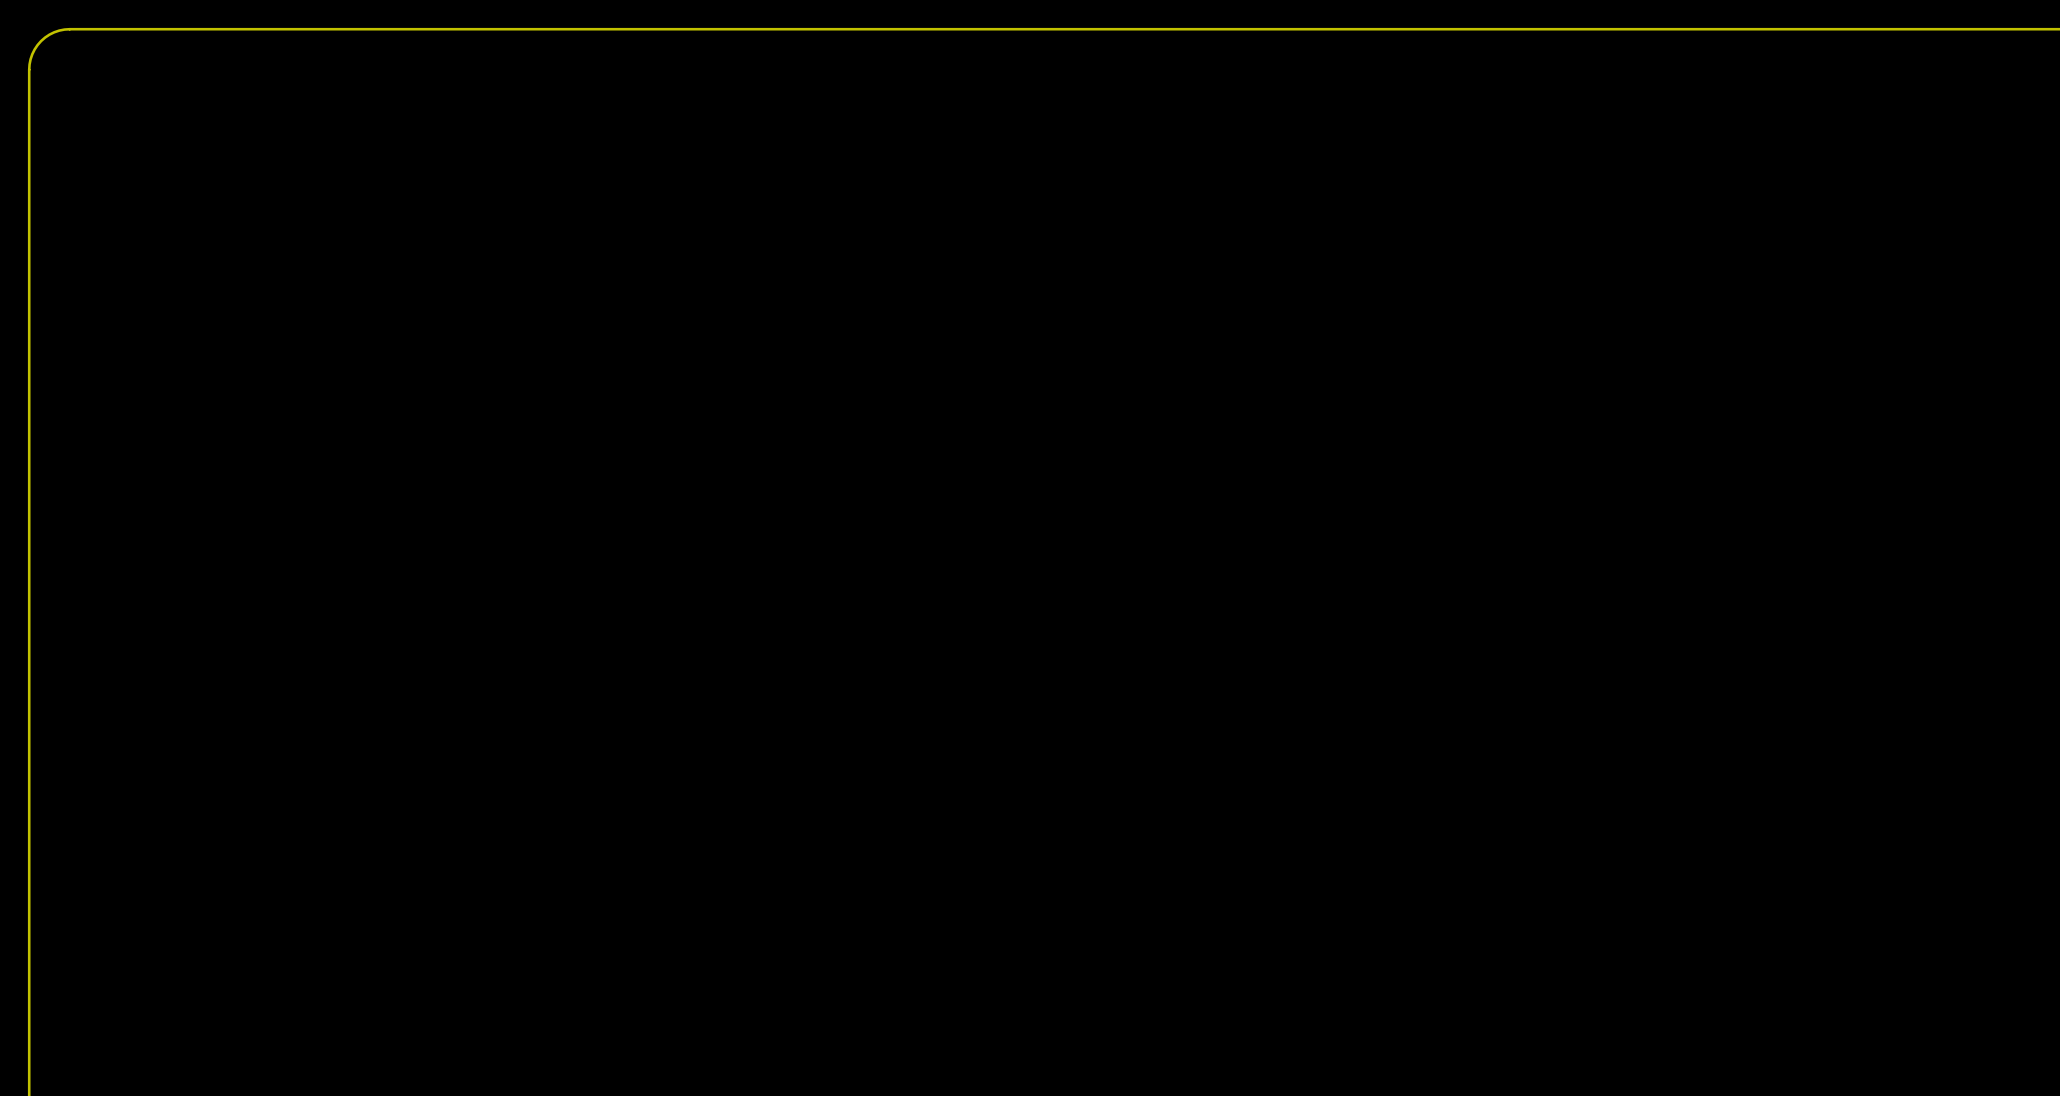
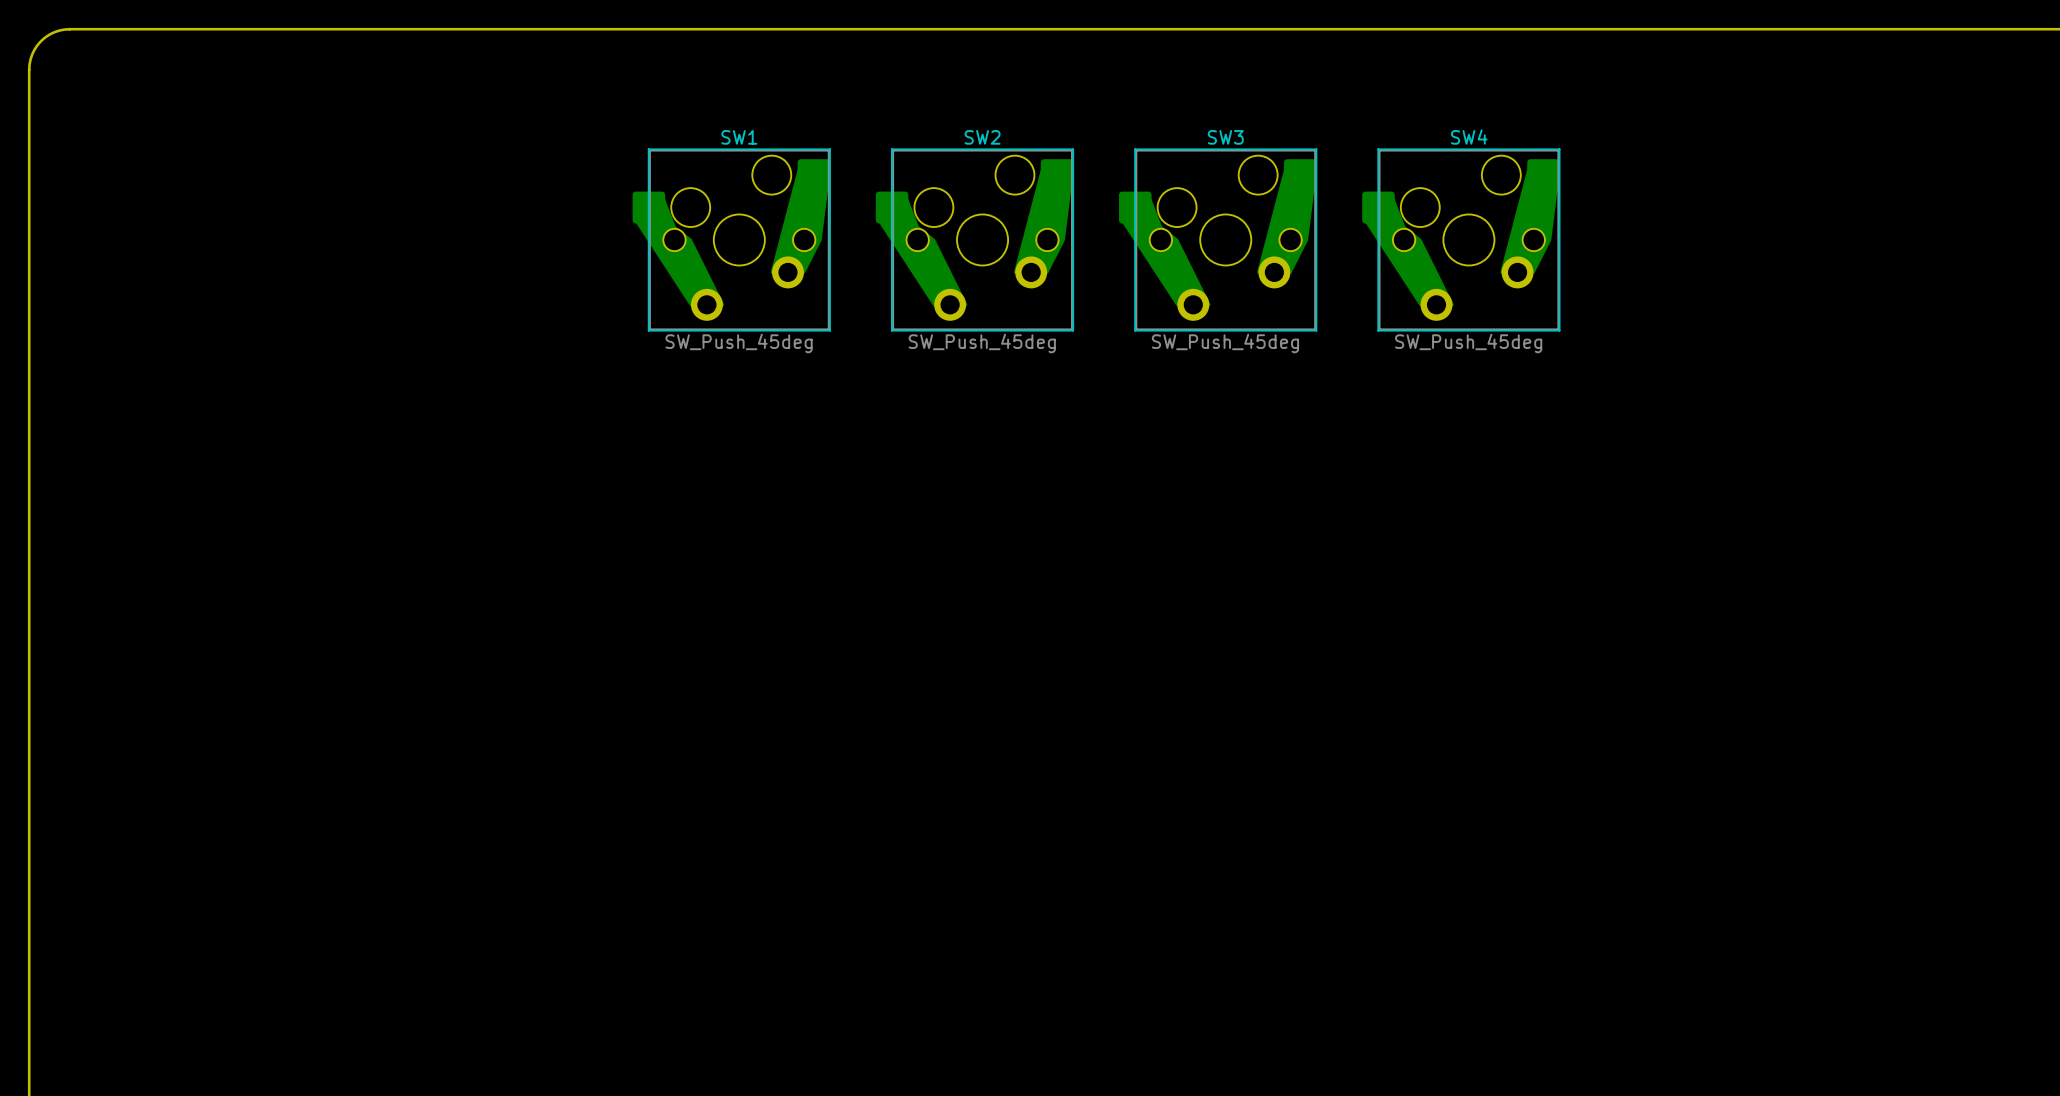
SW1: none -> SW_Push_45deg (731, 239)
SW2: none -> SW_Push_45deg (974, 239)
SW3: none -> SW_Push_45deg (1218, 239)
SW4: none -> SW_Push_45deg (1461, 239)

